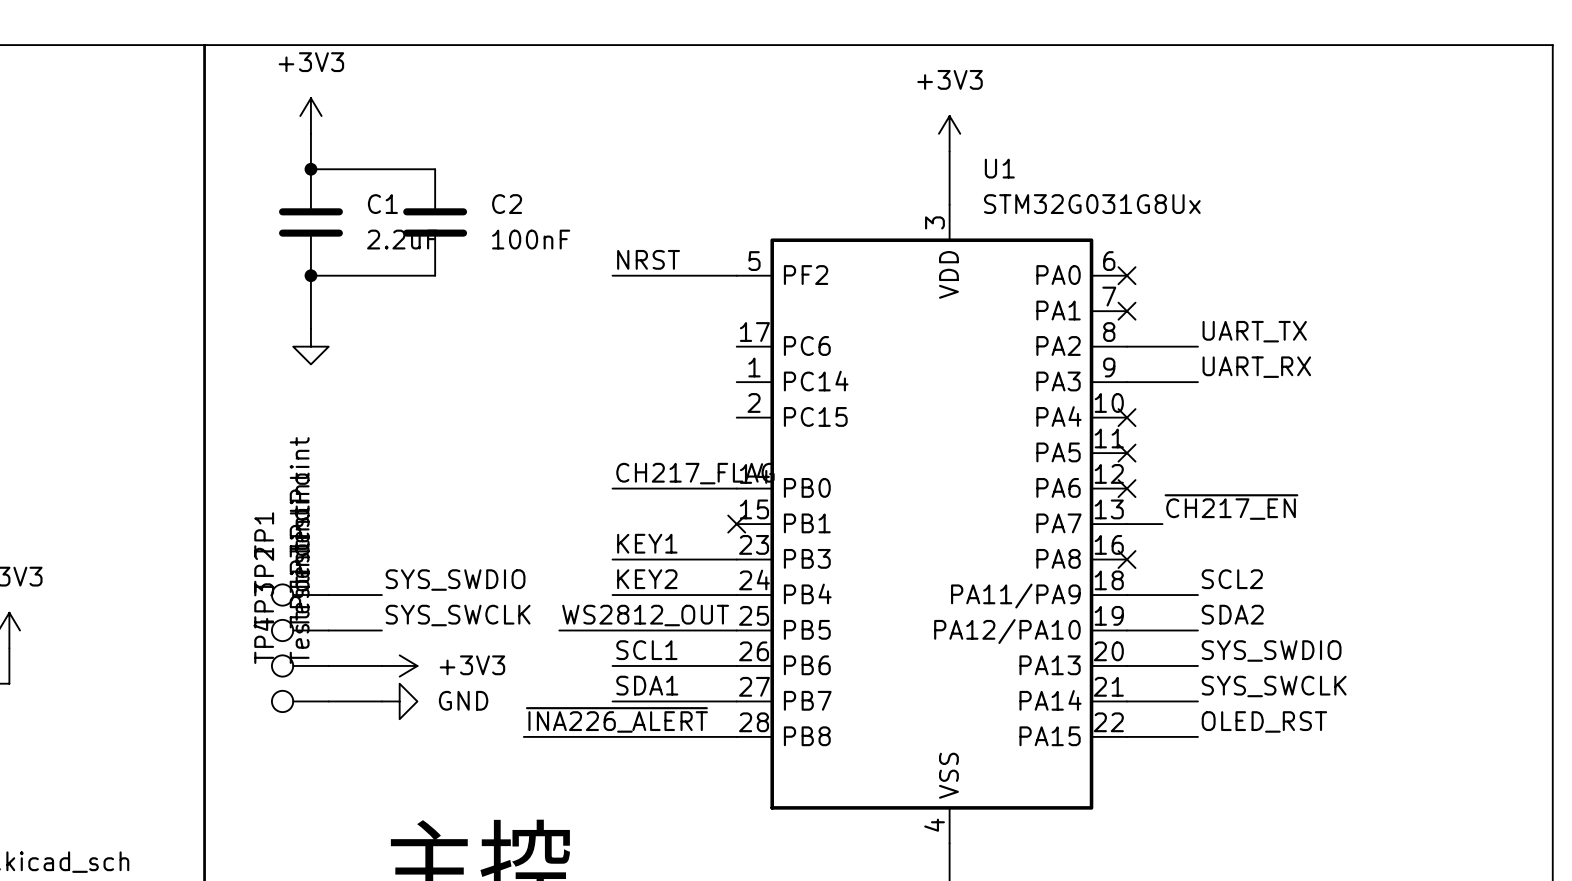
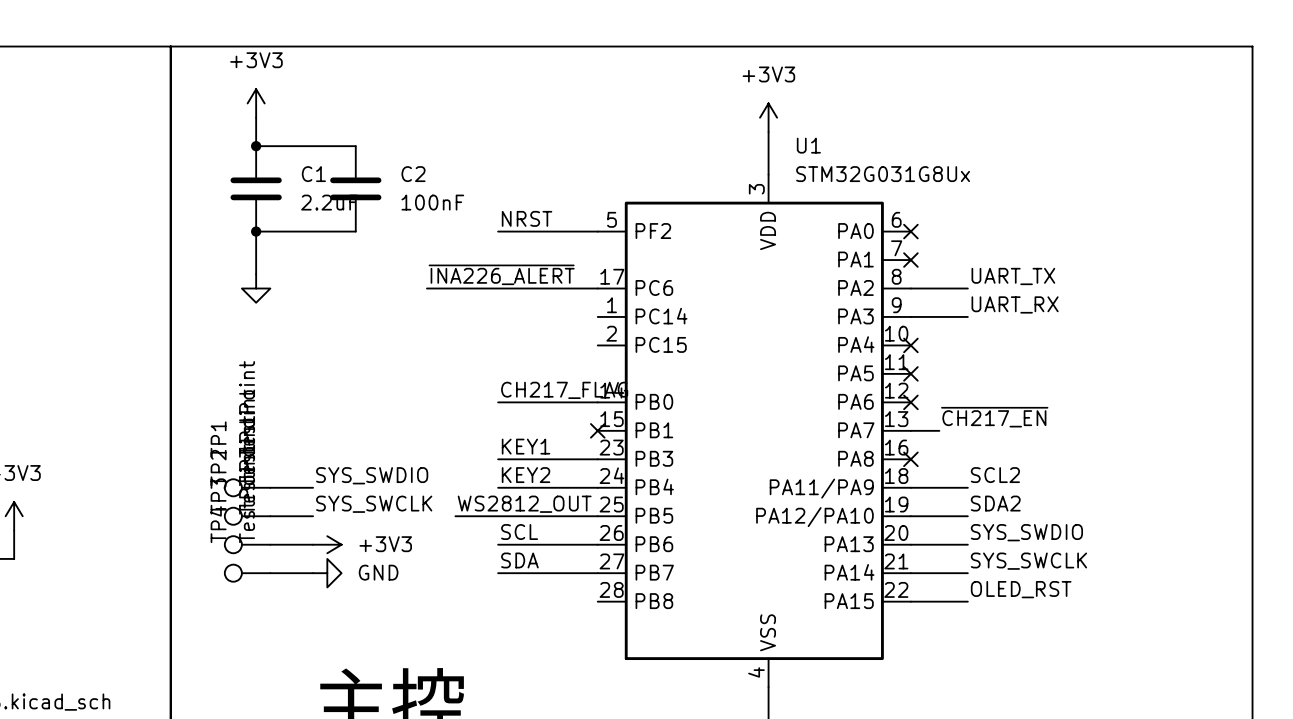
label: none -> ~{INA226_ALERT} (501, 274)
wire: none -> (426, 288) (597, 288)
label: SCL1 (646, 650) -> SCL (519, 532)
label: SDA1 (647, 685) -> SDA (519, 560)
label: ~{INA226_ALERT} (616, 719) -> none
wire: (523, 736) (736, 736) -> none

